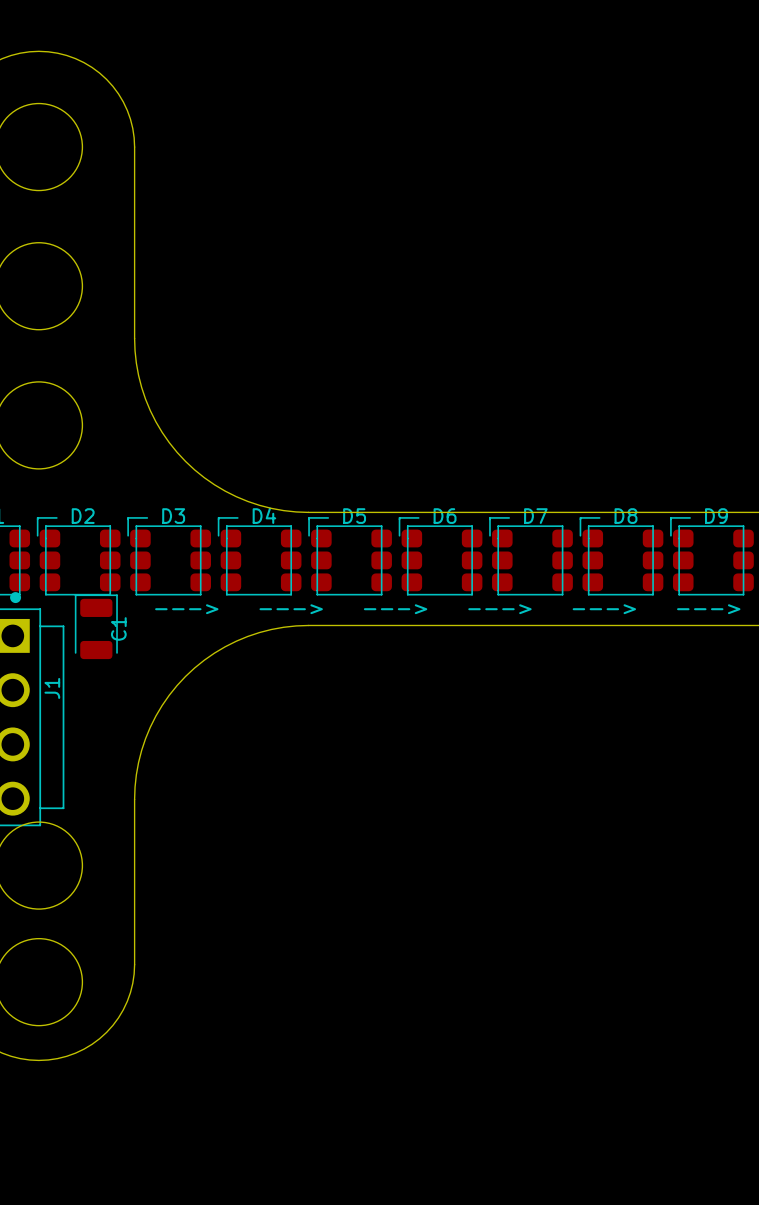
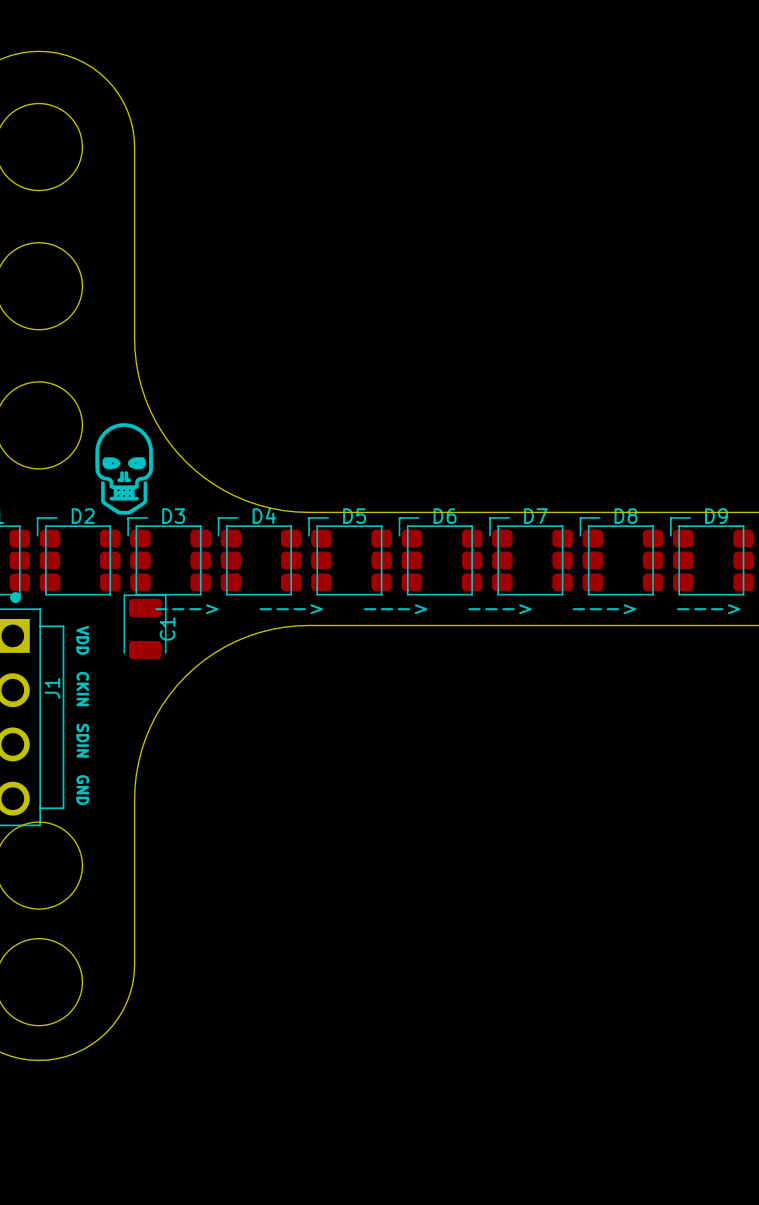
drawing: none -> [95, 423, 154, 515]
C1 position: (96, 626) -> (145, 626)
text: none -> VDD CKIN SDIN GND (82, 715)

